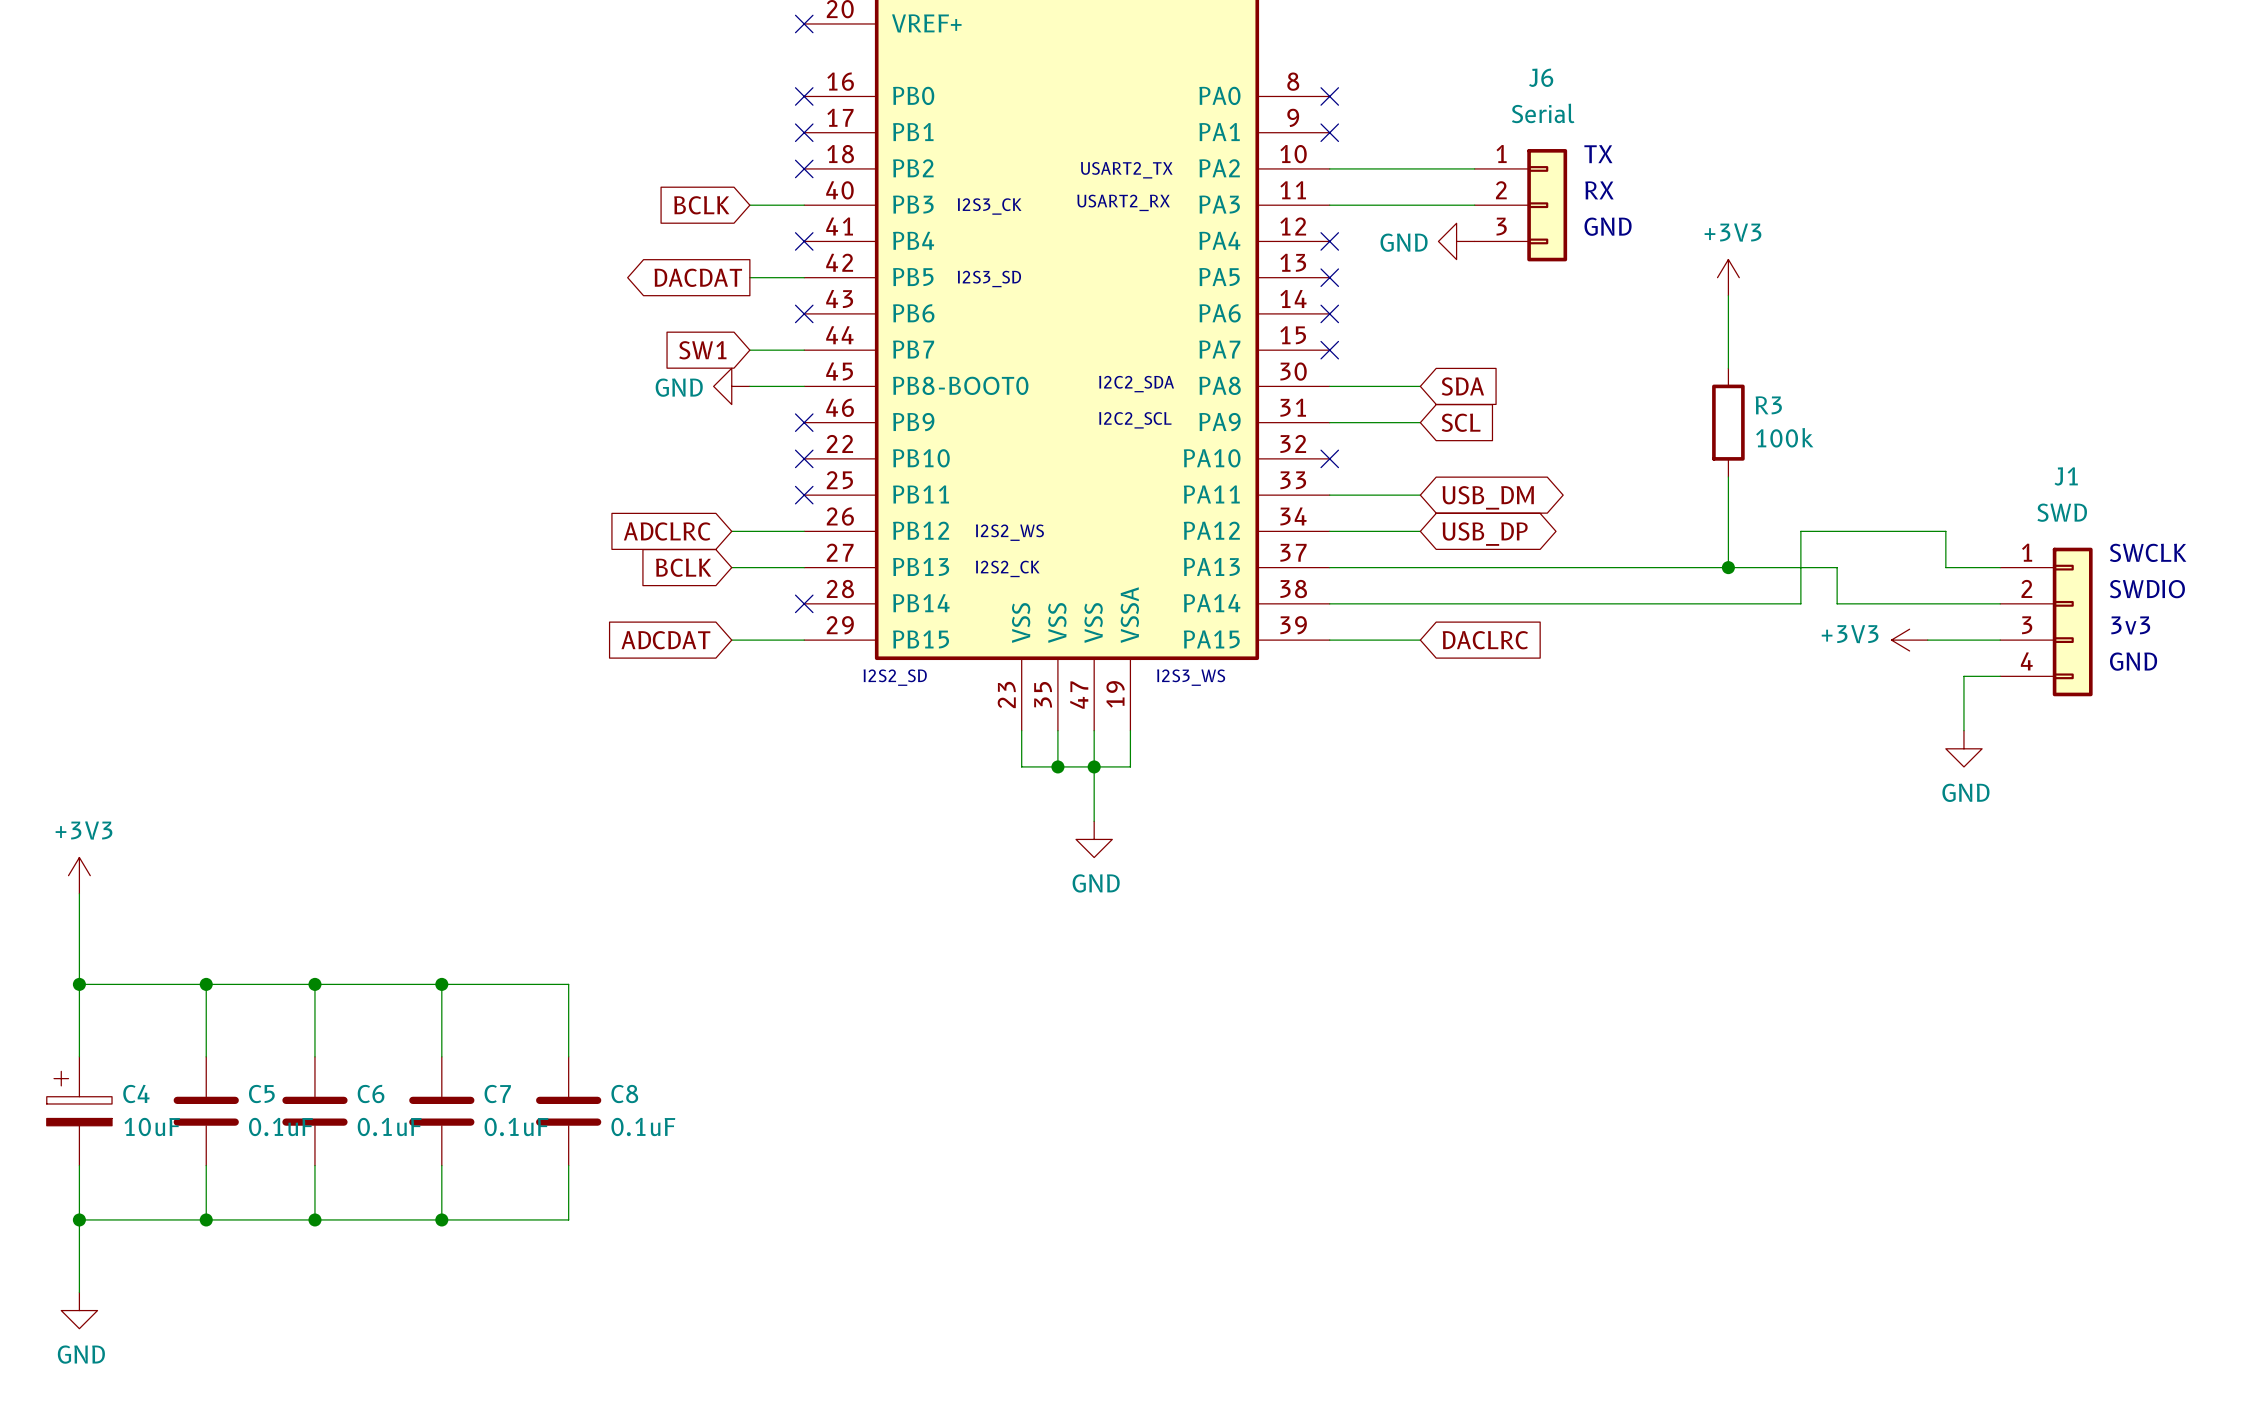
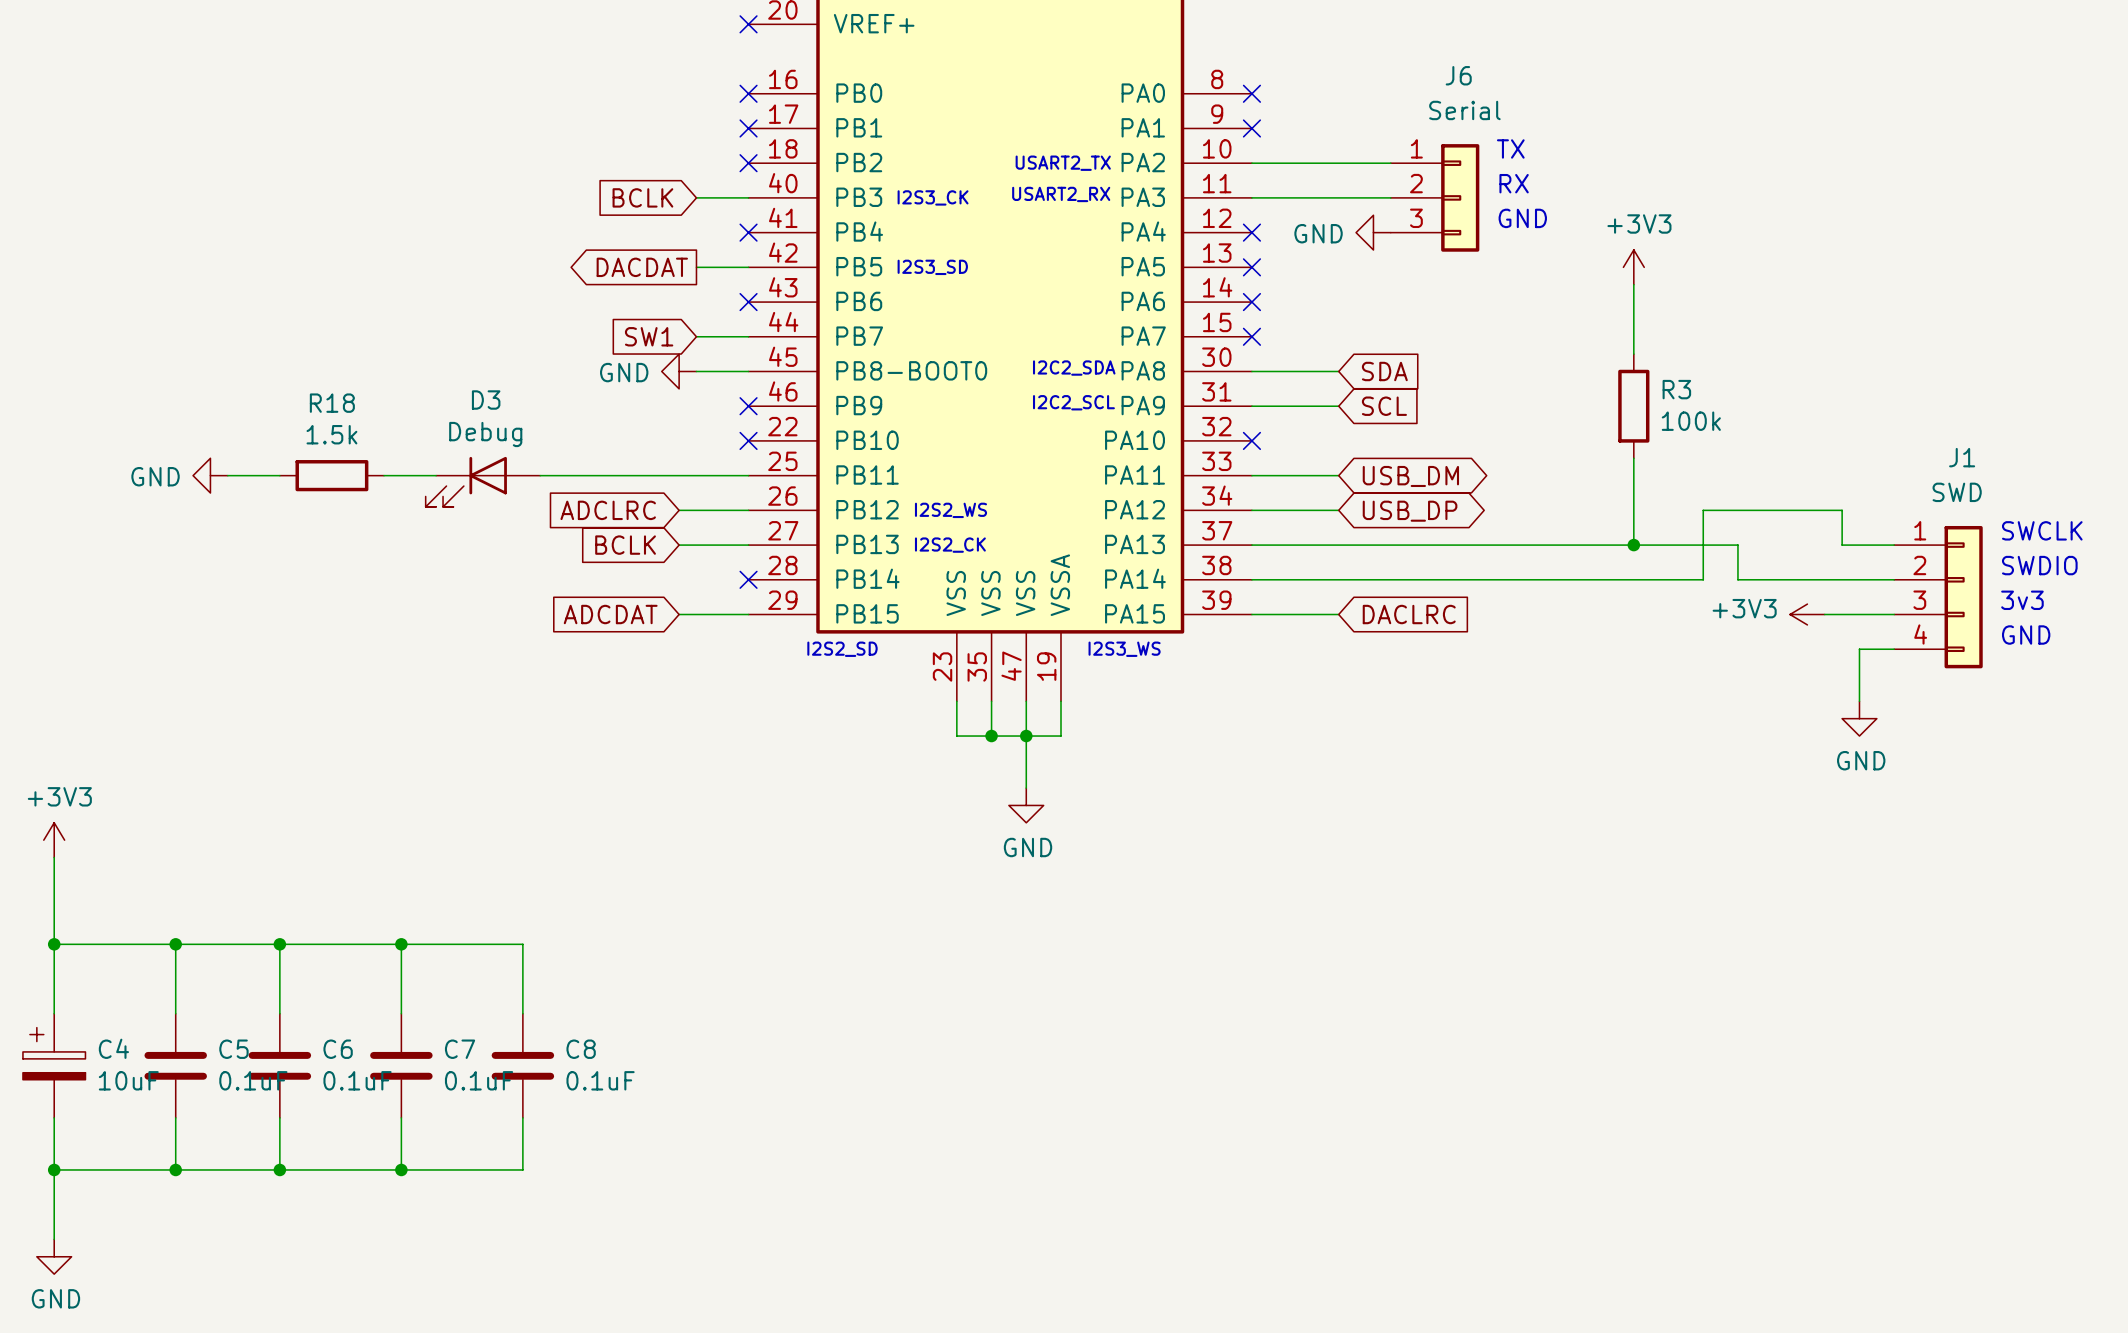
power symbol: none -> GND (210, 475)
wire: none -> (227, 475) (279, 475)
R18: none -> 1.5k (331, 475)
wire: none -> (384, 475) (436, 475)
wire: none -> (540, 475) (748, 475)
no-connect mark: (804, 495) -> none
D3: none -> Debug (482, 481)

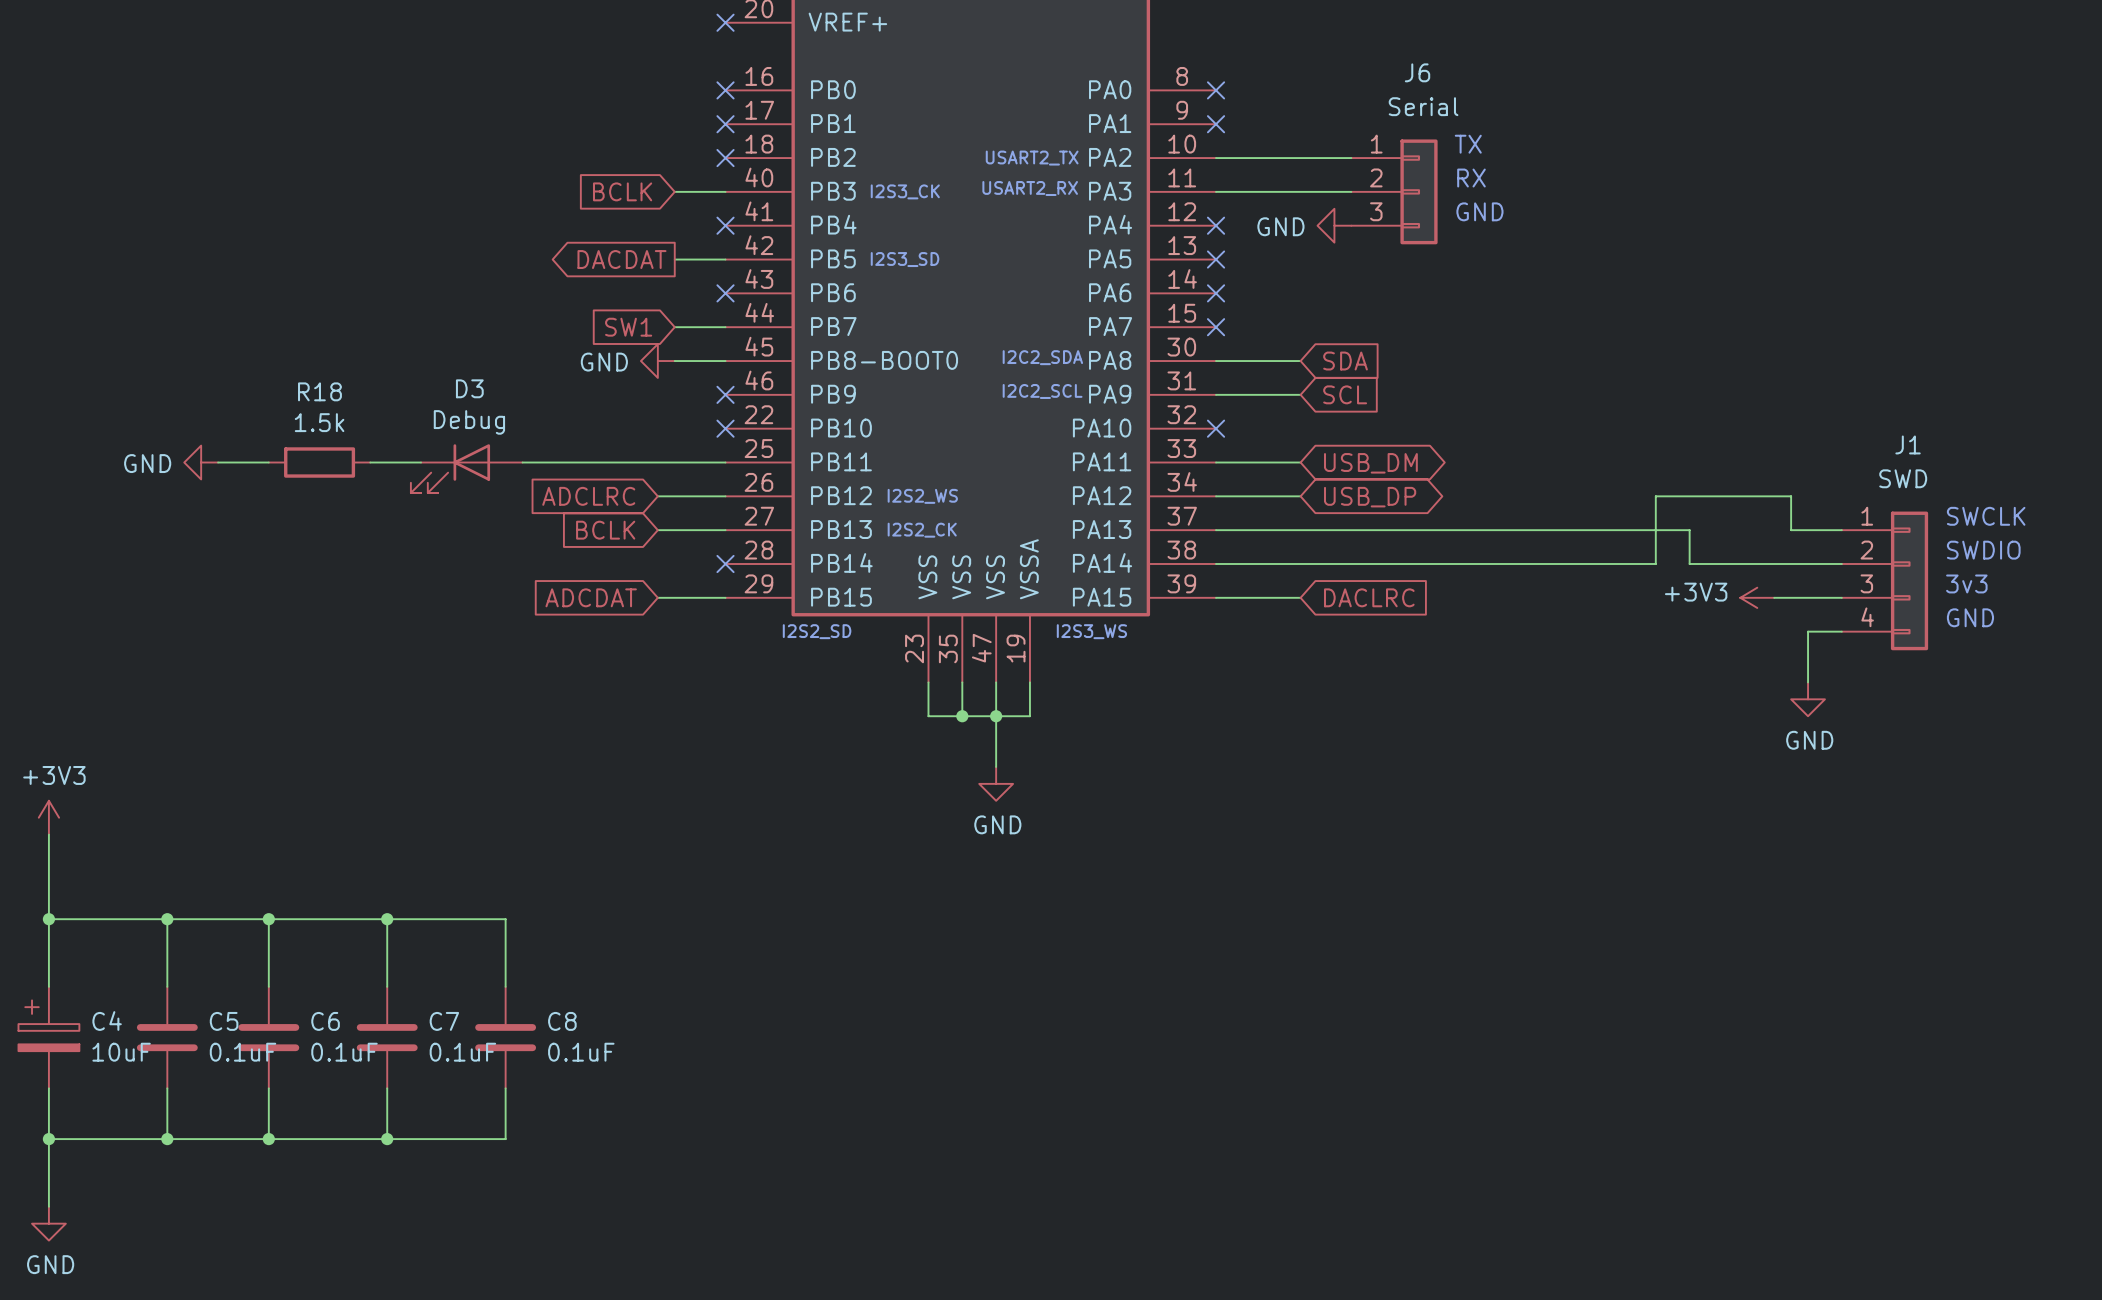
power symbol: +3V3 (1633, 267) -> none
wire: (1633, 284) (1633, 354) -> none
R3: 100k (1633, 406) -> none
wire: (1633, 458) (1633, 545) -> none
junction: (1633, 545) -> none

